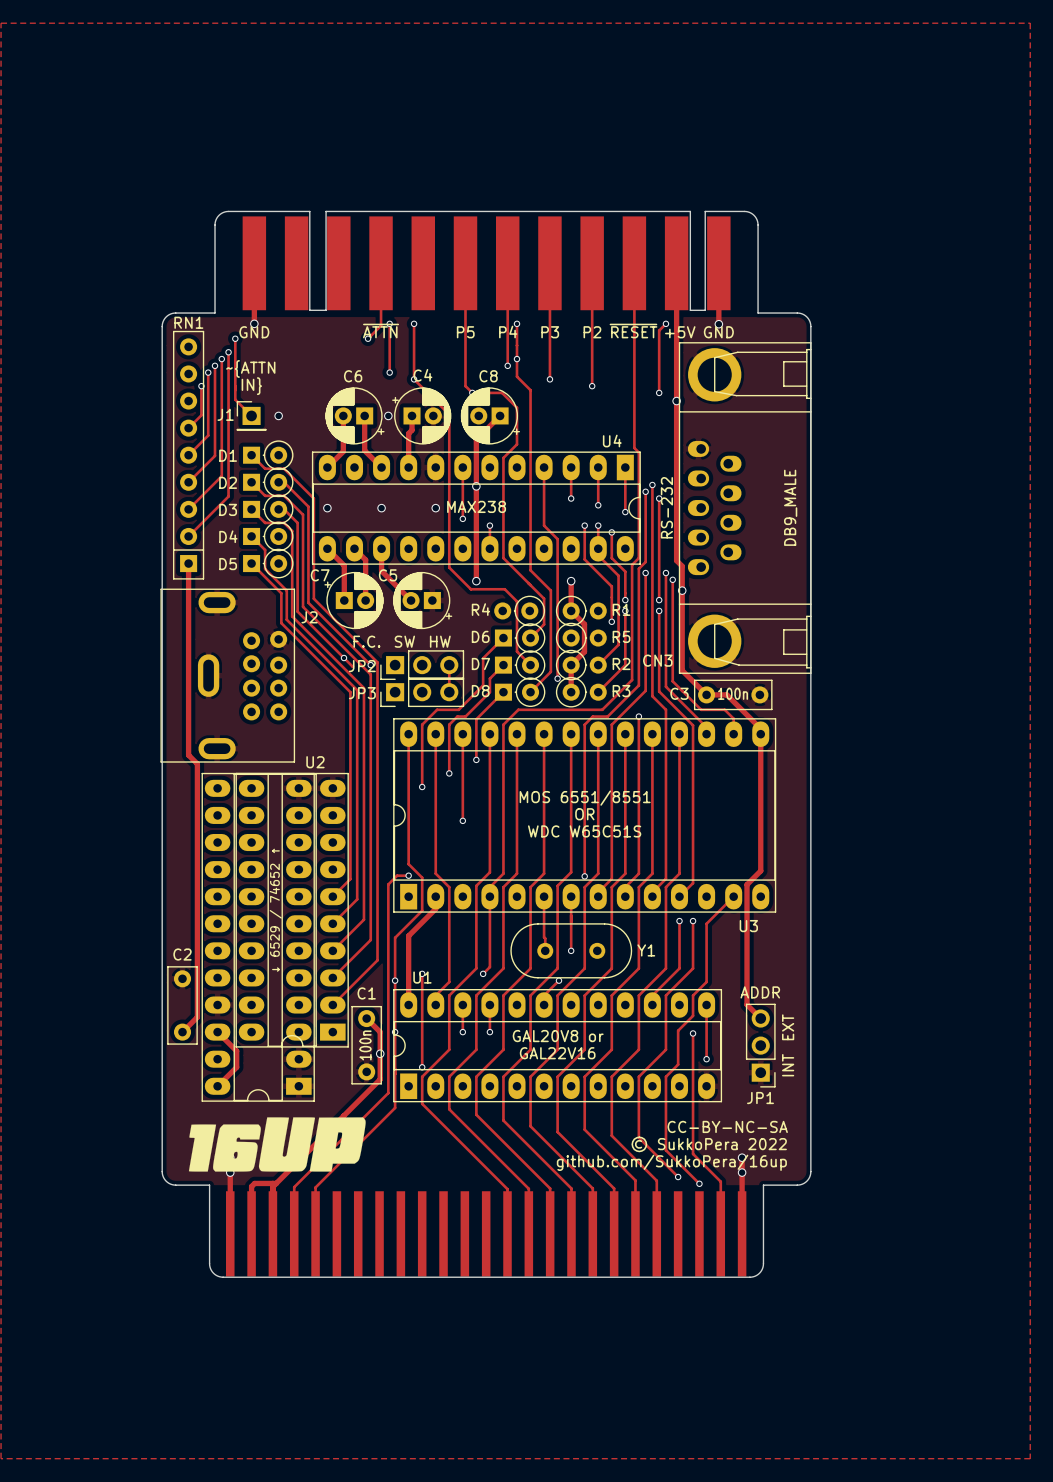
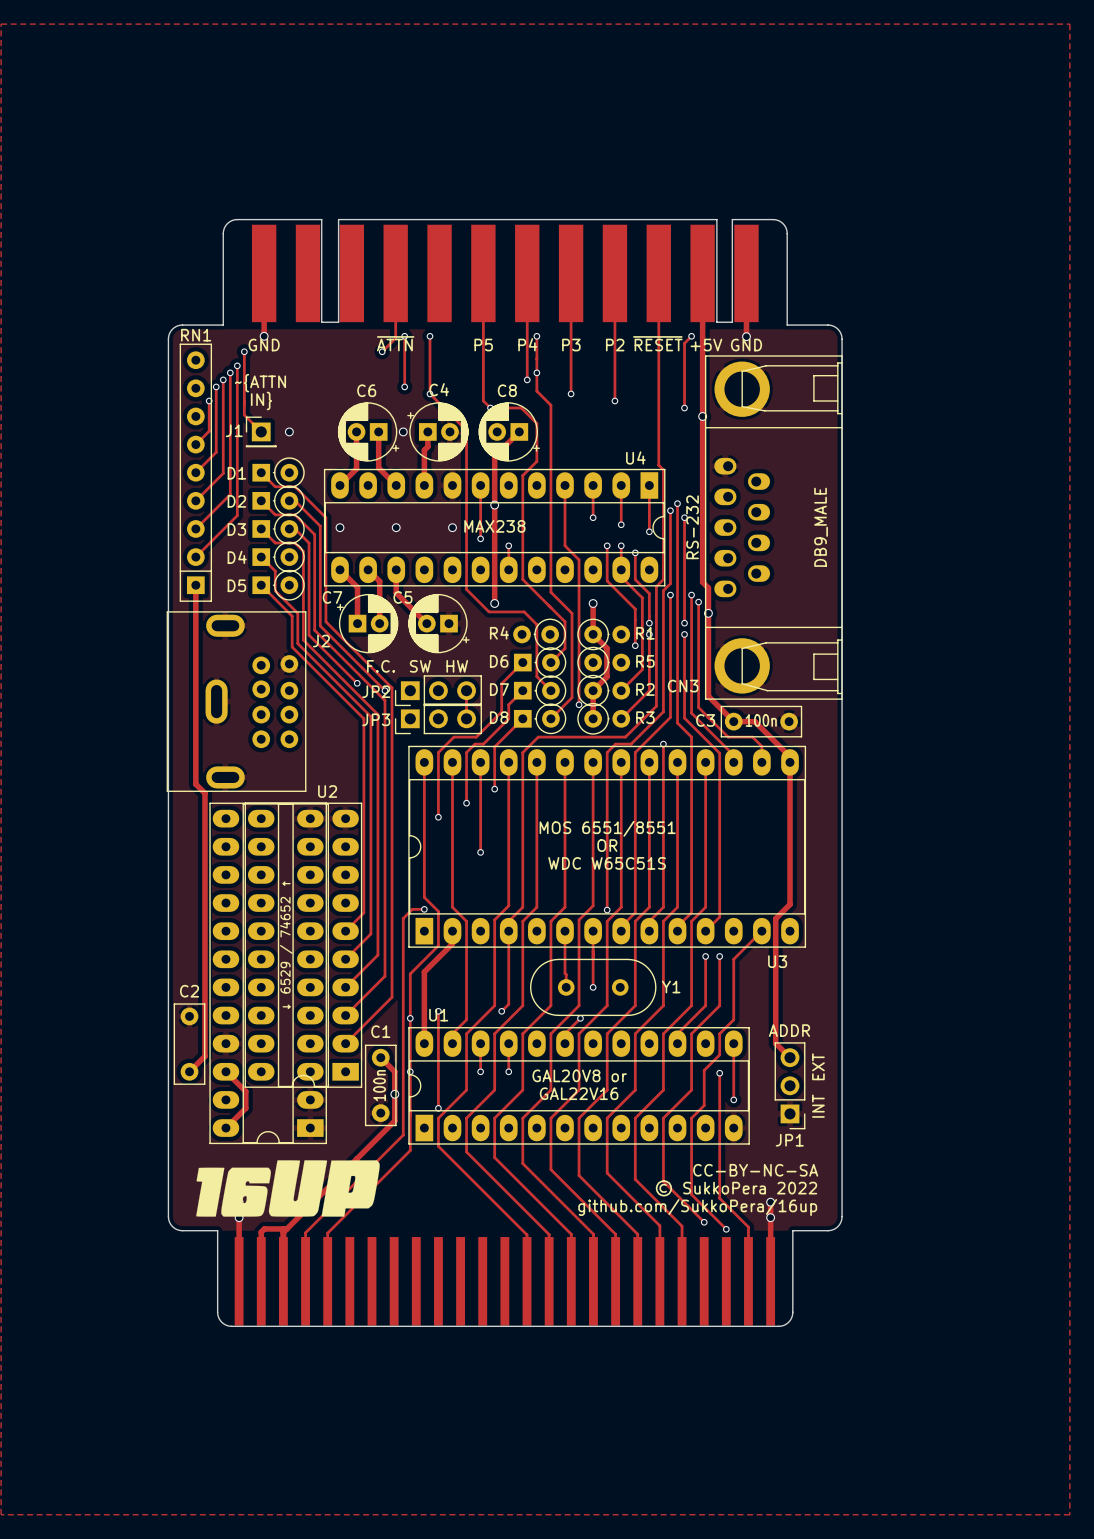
track: (343, 658) (353, 666) -> none

